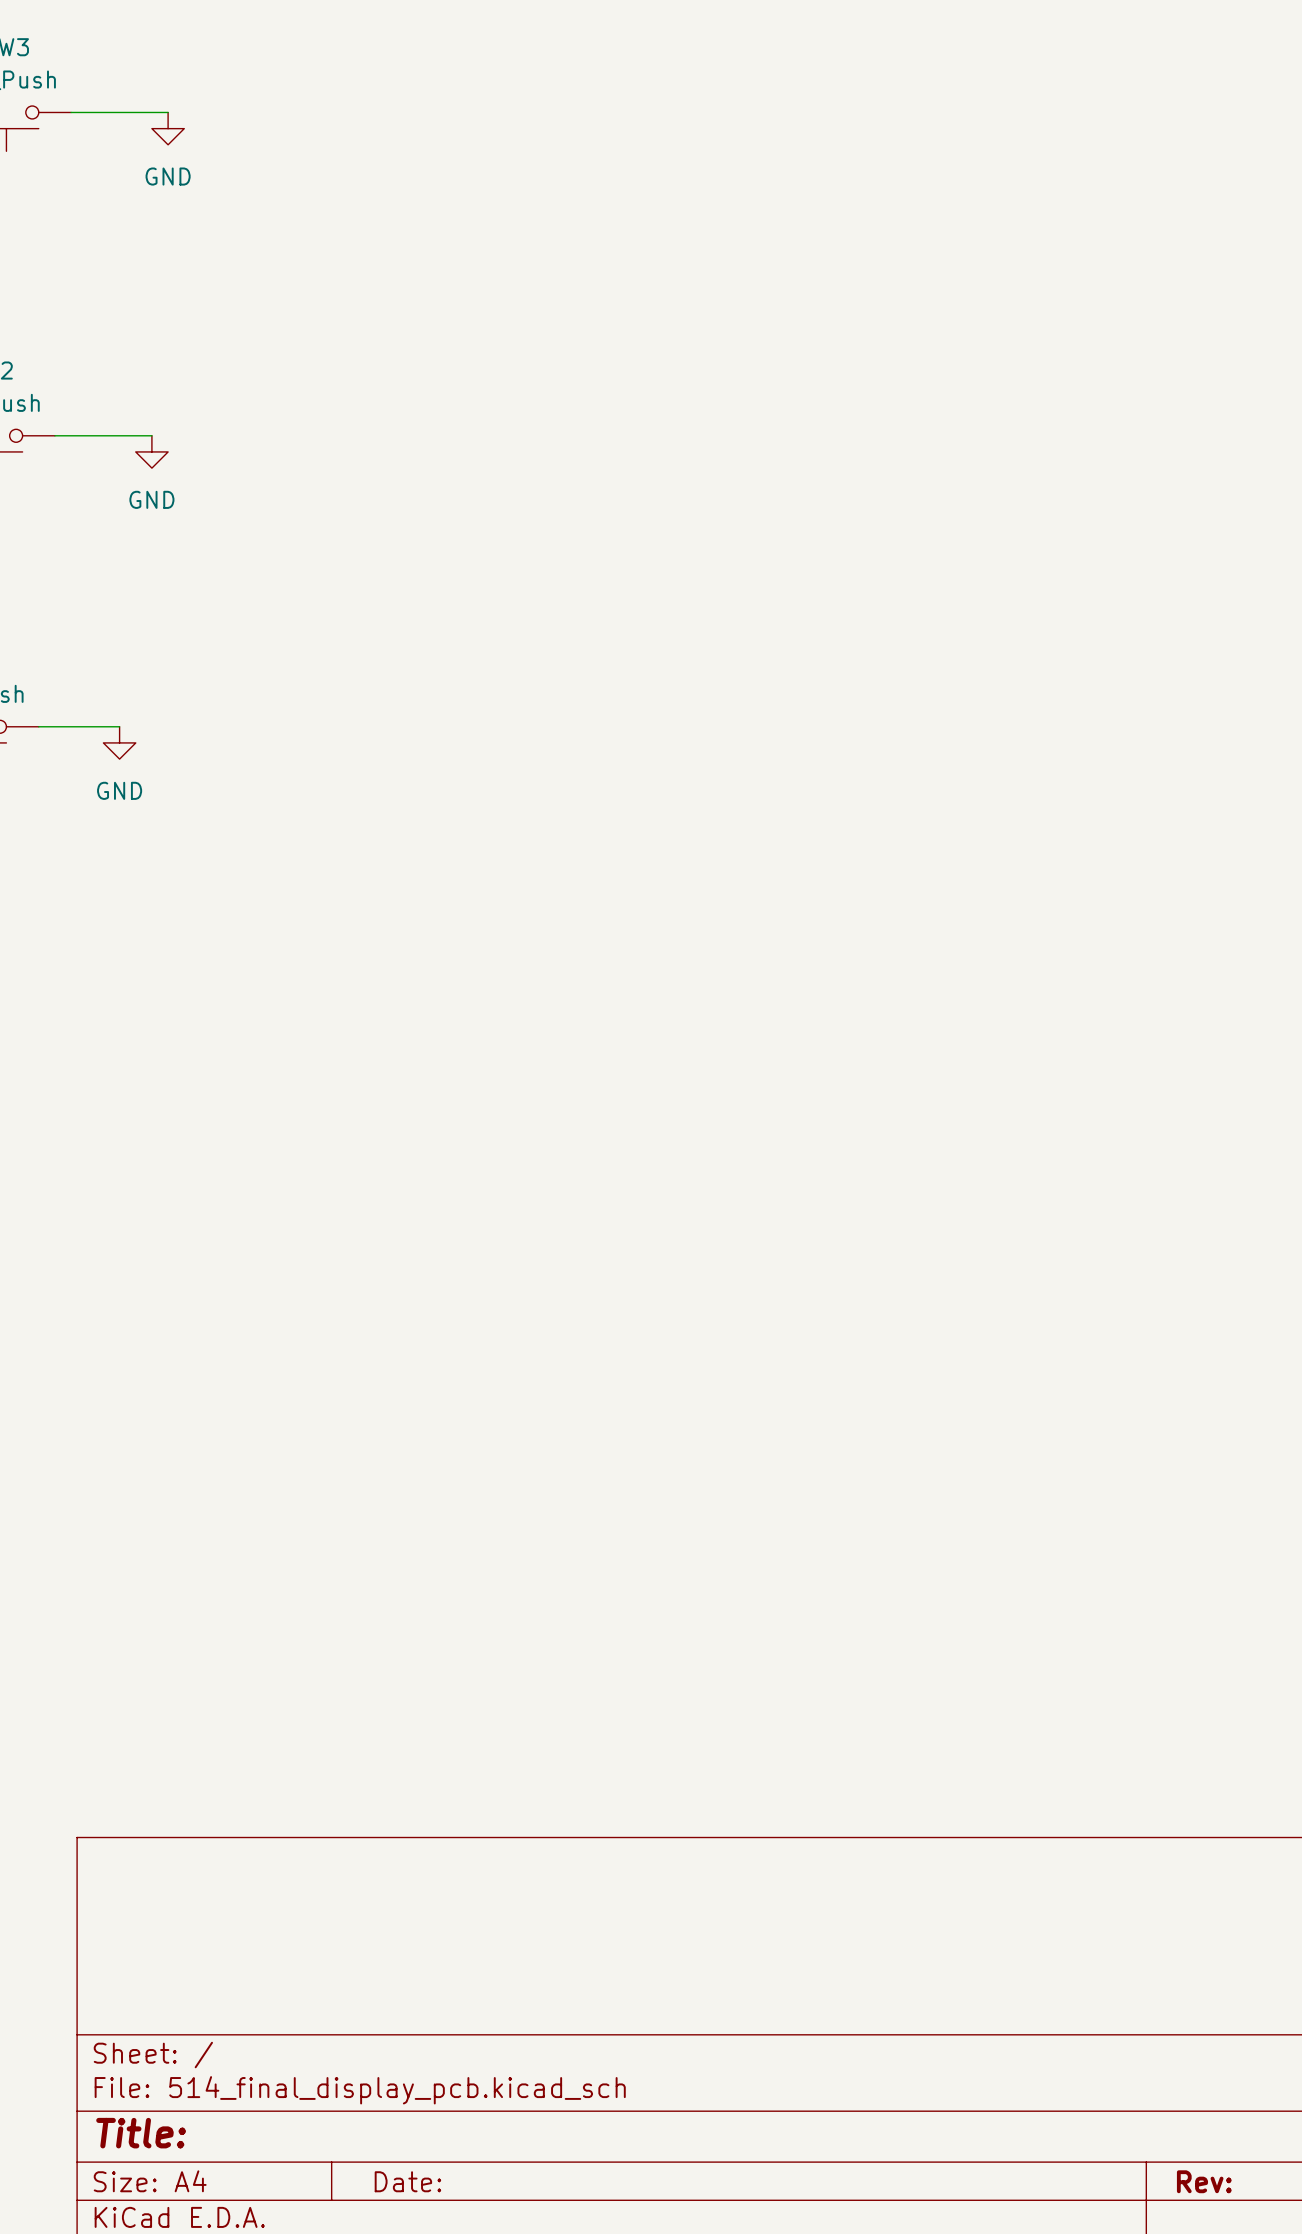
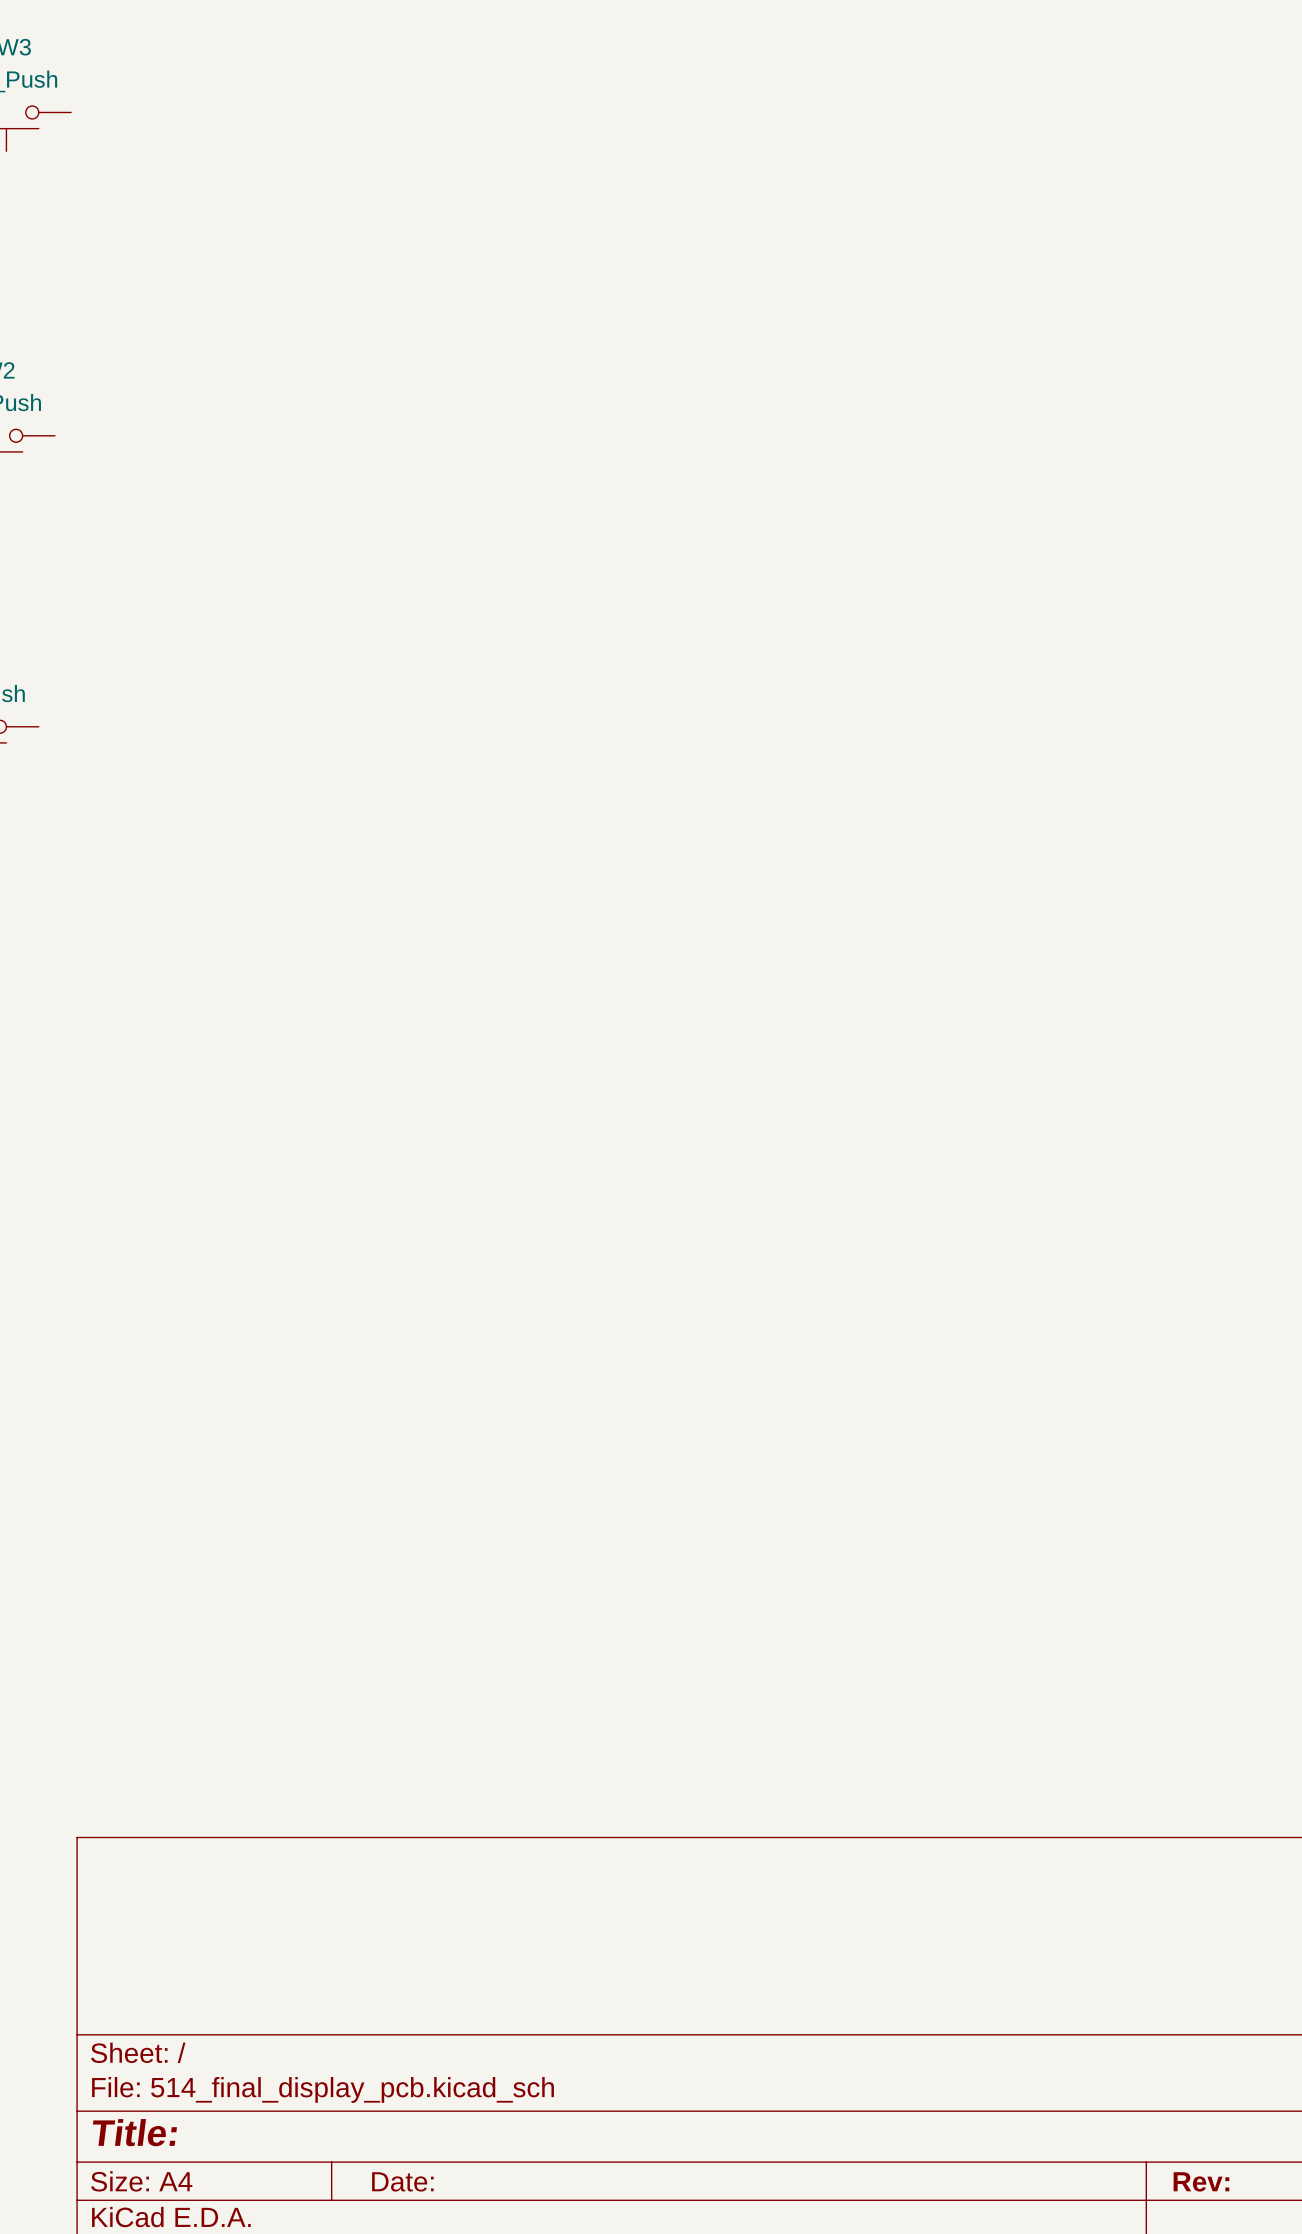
wire: (71, 112) (168, 112) -> none
power symbol: GND (168, 128) -> none
wire: (54, 435) (151, 435) -> none
power symbol: GND (151, 451) -> none
wire: (38, 726) (119, 726) -> none
power symbol: GND (119, 742) -> none

